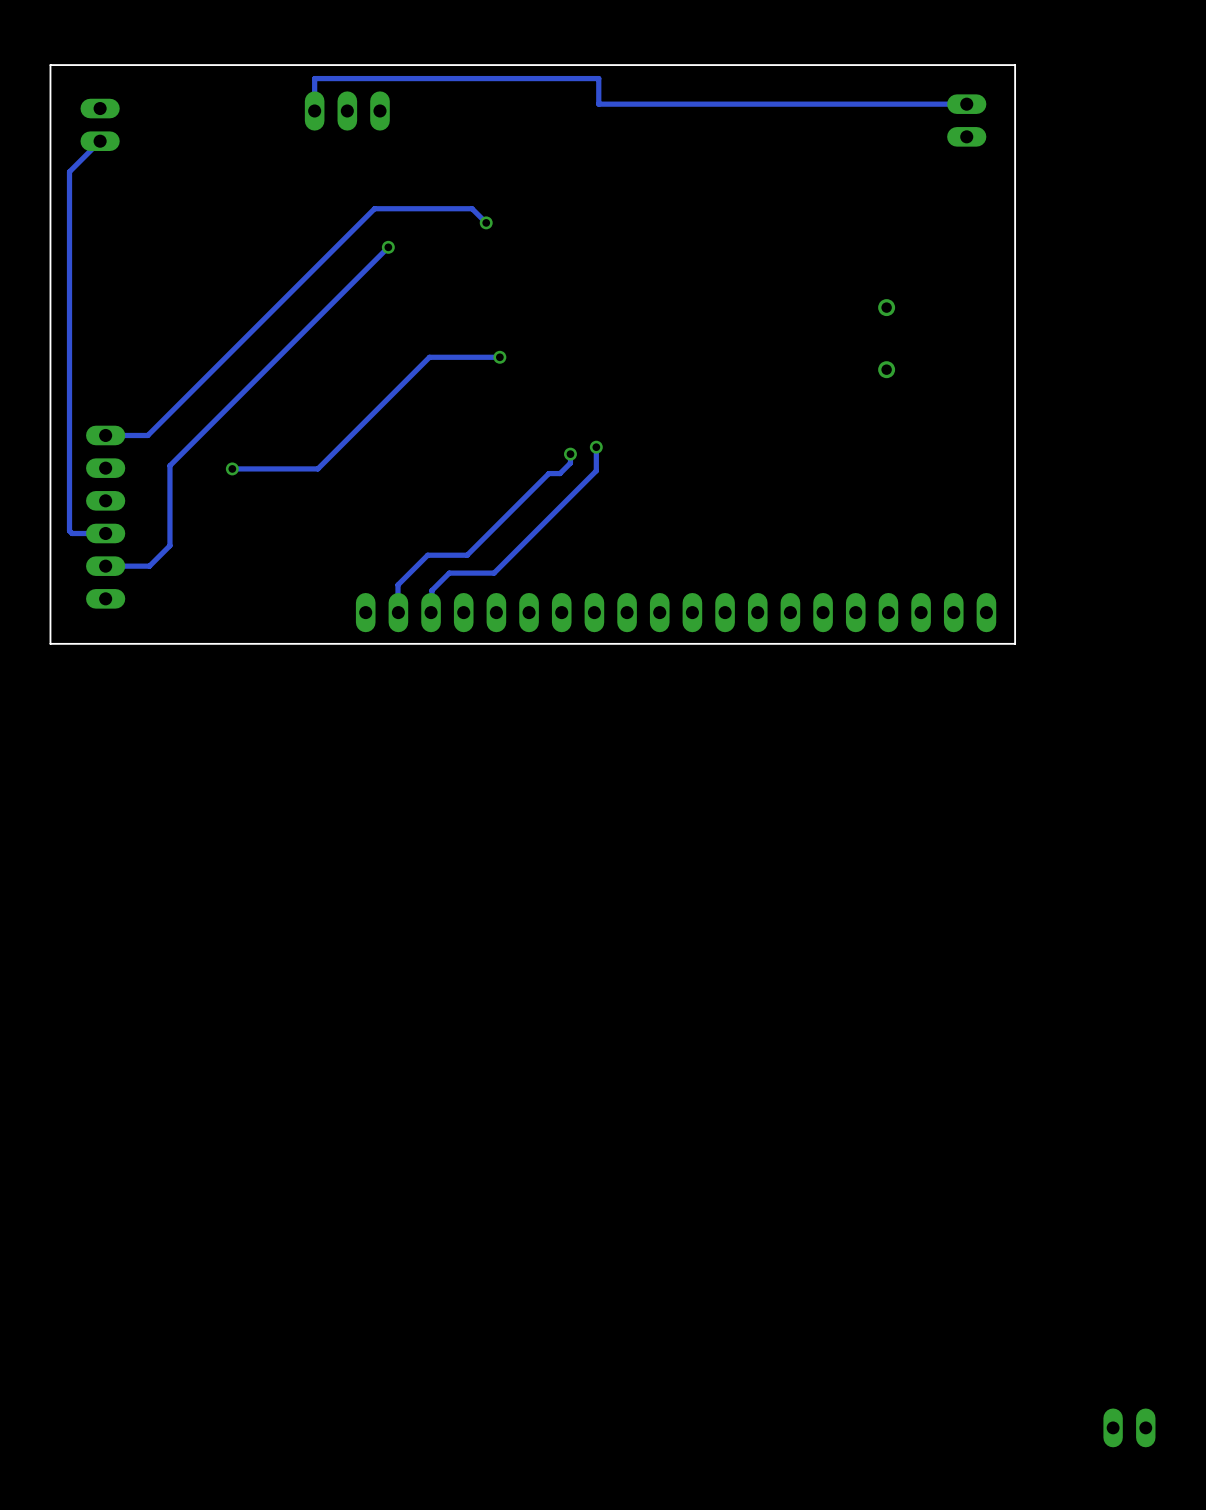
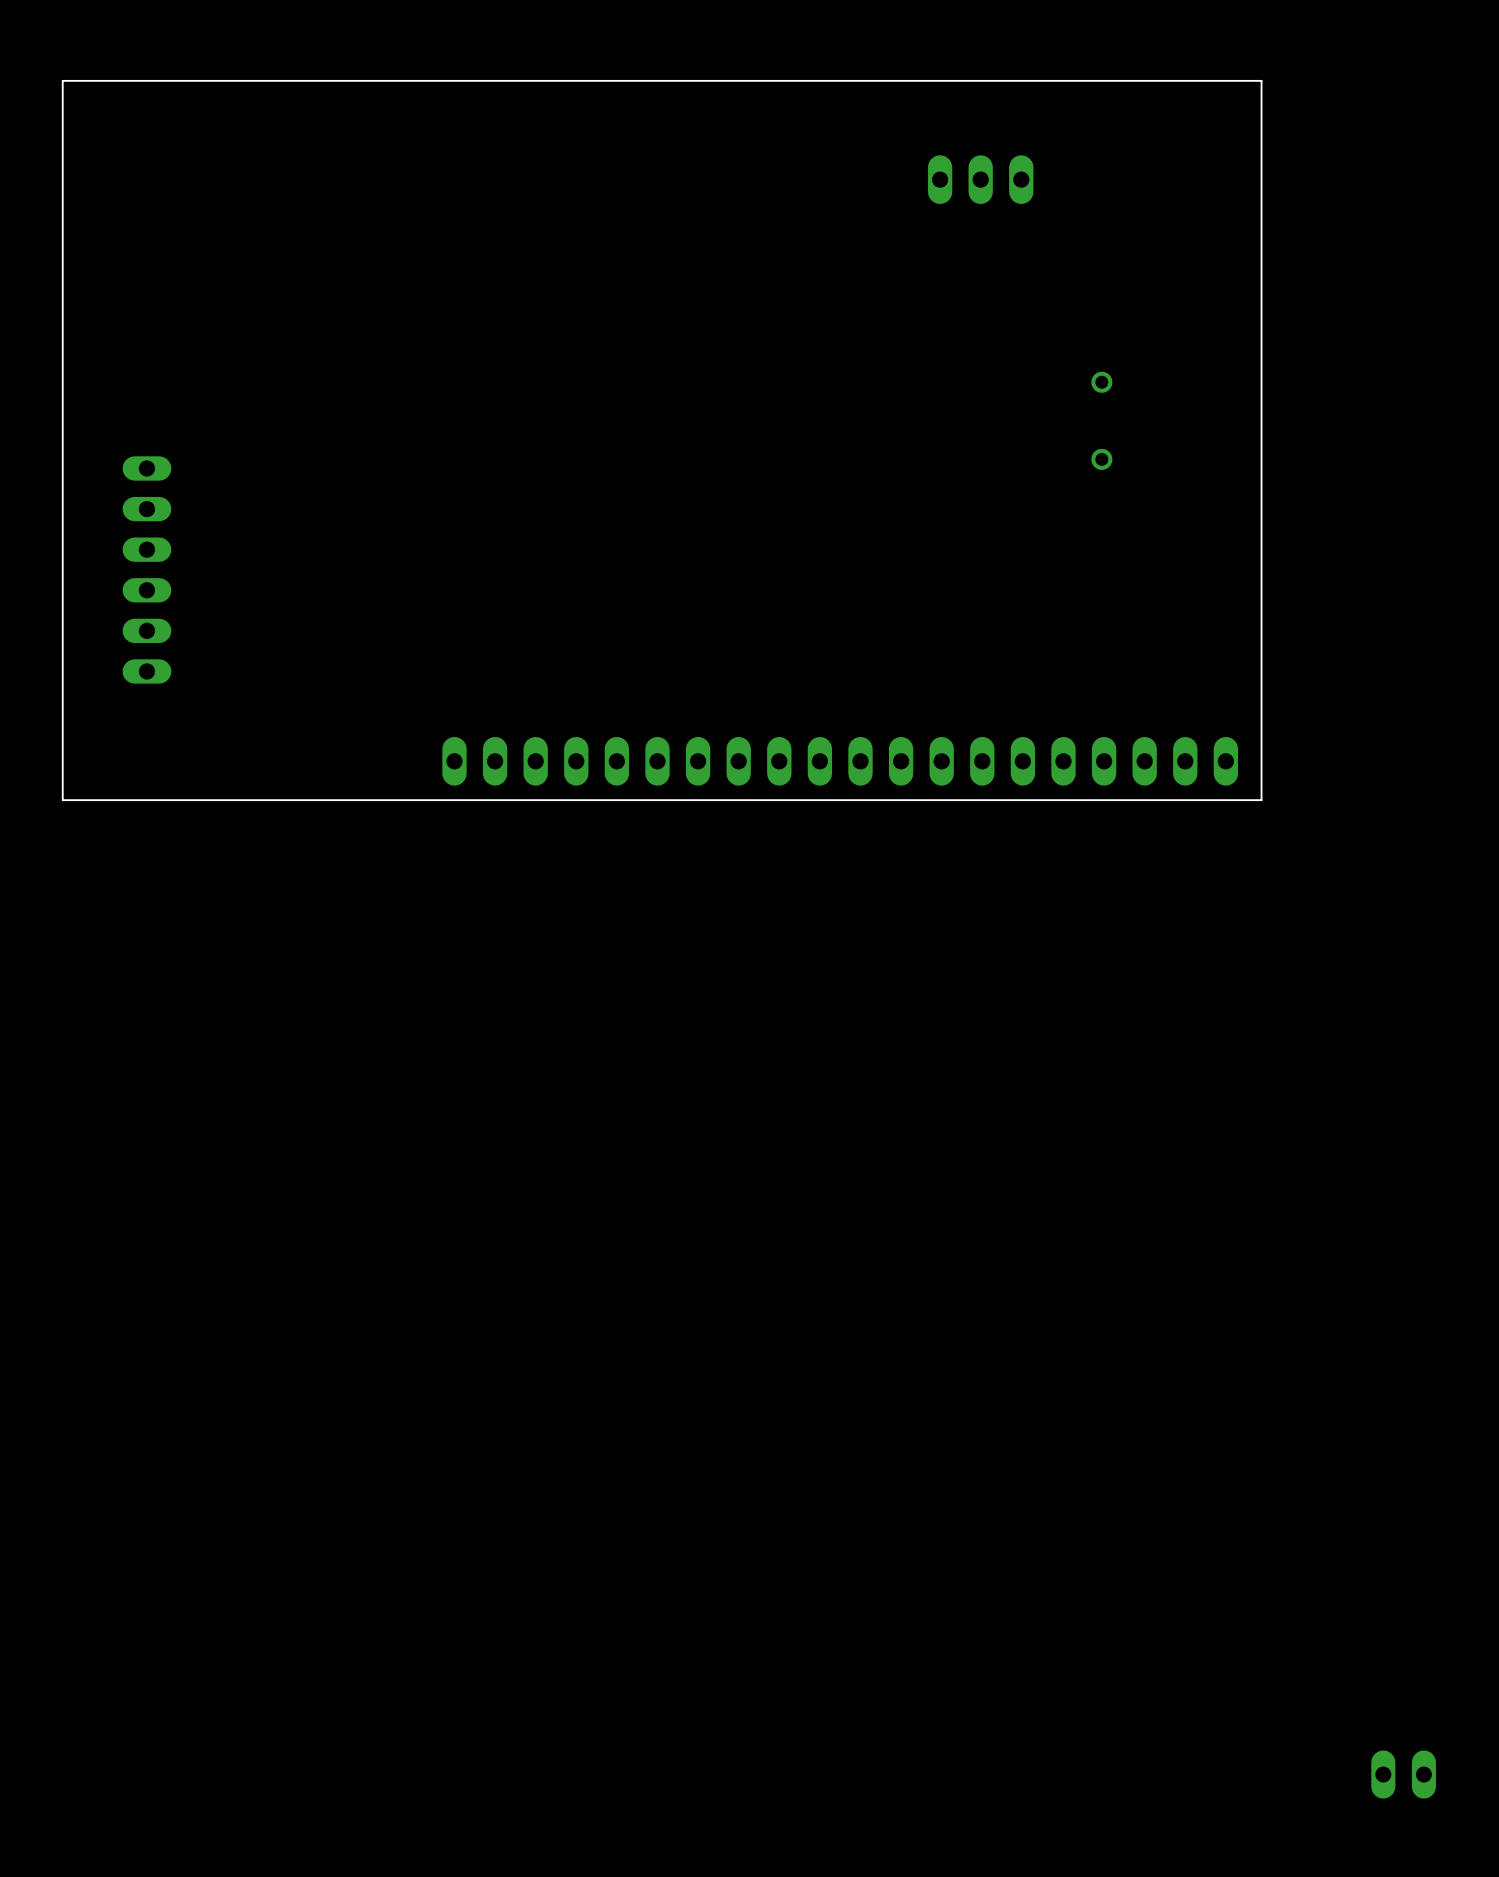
track: (966, 104) (598, 104) (598, 78) (314, 78) (314, 110) -> none
part: (347, 110) -> none
part: (966, 120) -> none
part: (100, 124) -> none
track: (100, 141) (69, 171) (69, 530) (72, 533) (105, 533) -> none
part: none -> (980, 179)
track: (486, 222) (472, 208) (374, 208) (147, 435) (105, 435) -> none
via: (486, 222) -> none
track: (388, 247) (169, 465) (169, 545) (149, 566) (105, 566) -> none
via: (388, 247) -> none
track: (499, 357) (429, 357) (317, 468) (232, 468) -> none
via: (499, 357) -> none
track: (596, 447) (596, 470) (494, 573) (449, 573) (431, 590) (431, 612) -> none
via: (596, 447) -> none
track: (570, 454) (570, 463) (560, 473) (548, 473) (467, 555) (427, 555) (398, 584) (398, 612) -> none
via: (570, 454) -> none
via: (232, 468) -> none
part position: (105, 517) -> (146, 569)

